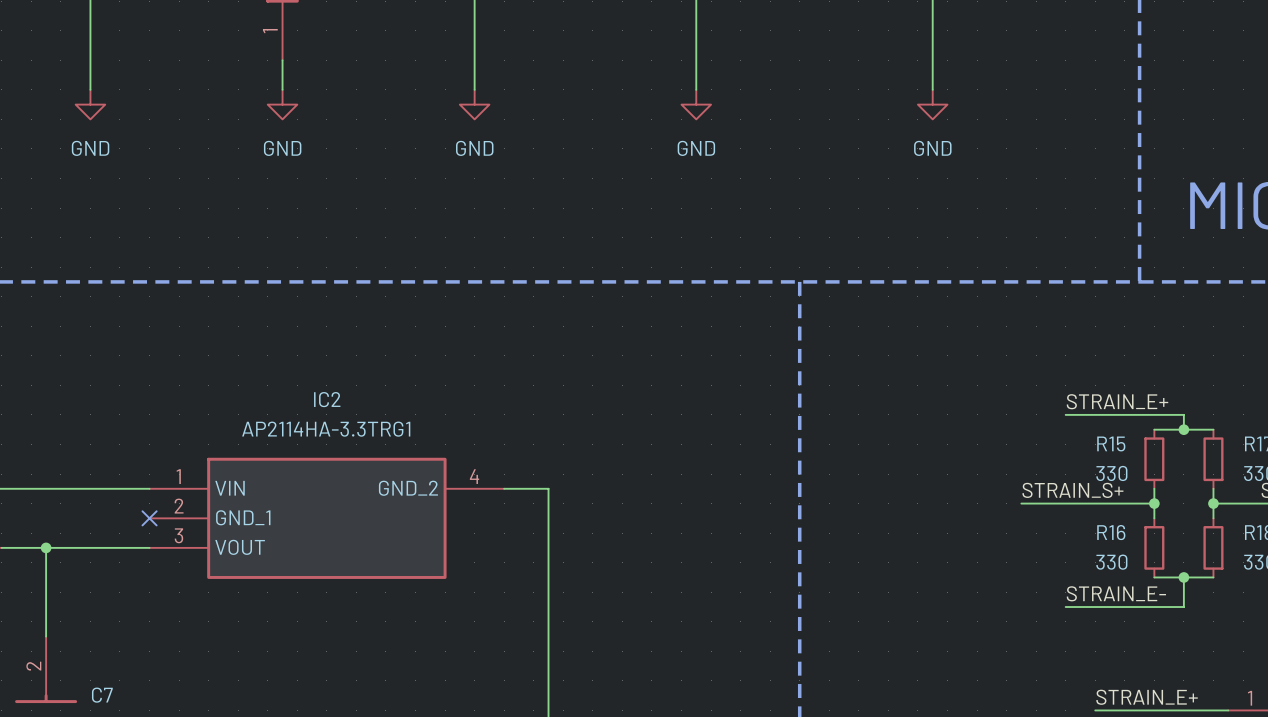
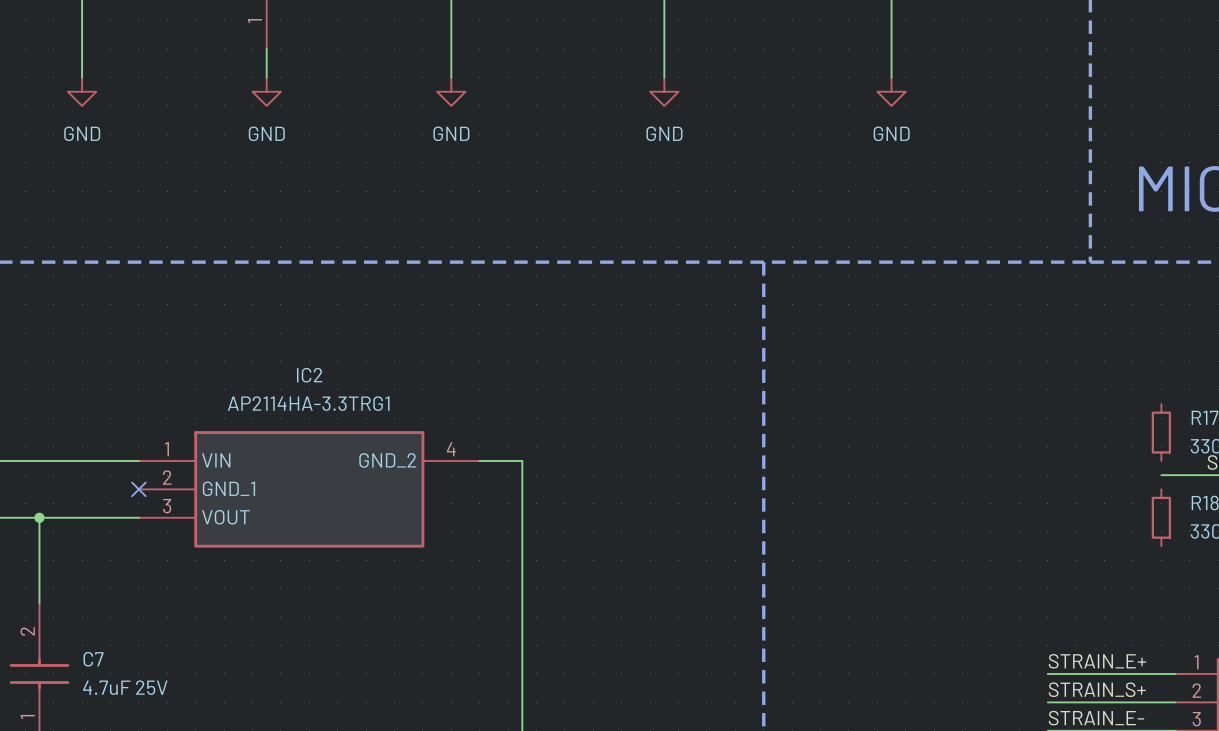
label: STRAIN_E+ (1117, 401) -> none
wire: (1065, 414) (1183, 414) (1183, 429) -> none
wire: (1154, 429) (1213, 429) -> none
junction: (1183, 429) -> none
R15: 330 (1154, 459) -> none
wire: (1154, 488) (1154, 518) -> none
wire: (1213, 488) (1213, 518) -> none
label: STRAIN_S+ (1072, 490) -> none
wire: (1021, 503) (1154, 503) -> none
junction: (1154, 503) -> none
junction: (1213, 503) -> none
R16: 330 (1154, 547) -> none
wire: (1154, 577) (1213, 577) -> none
wire: (1183, 577) (1183, 607) (1065, 607) -> none
junction: (1183, 577) -> none
label: STRAIN_E- (1116, 593) -> none

